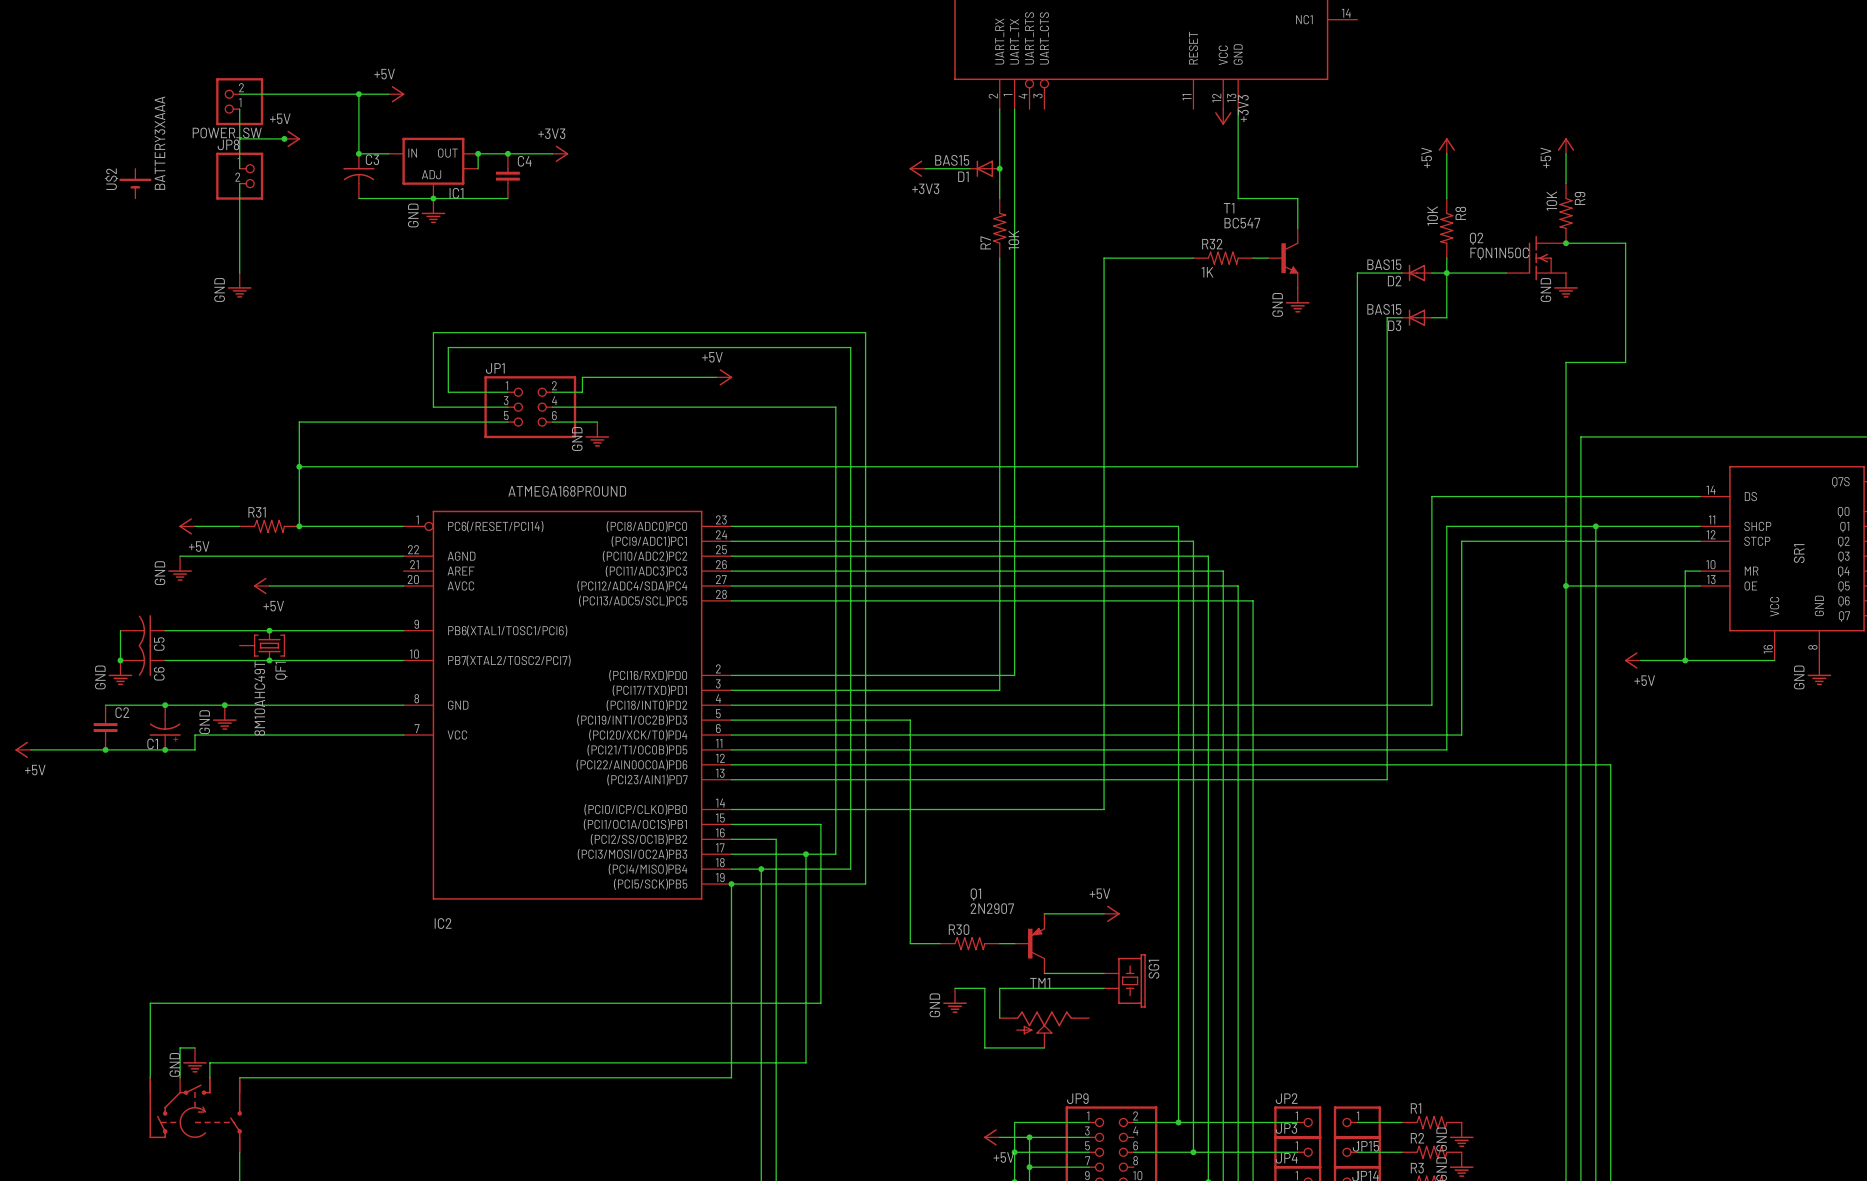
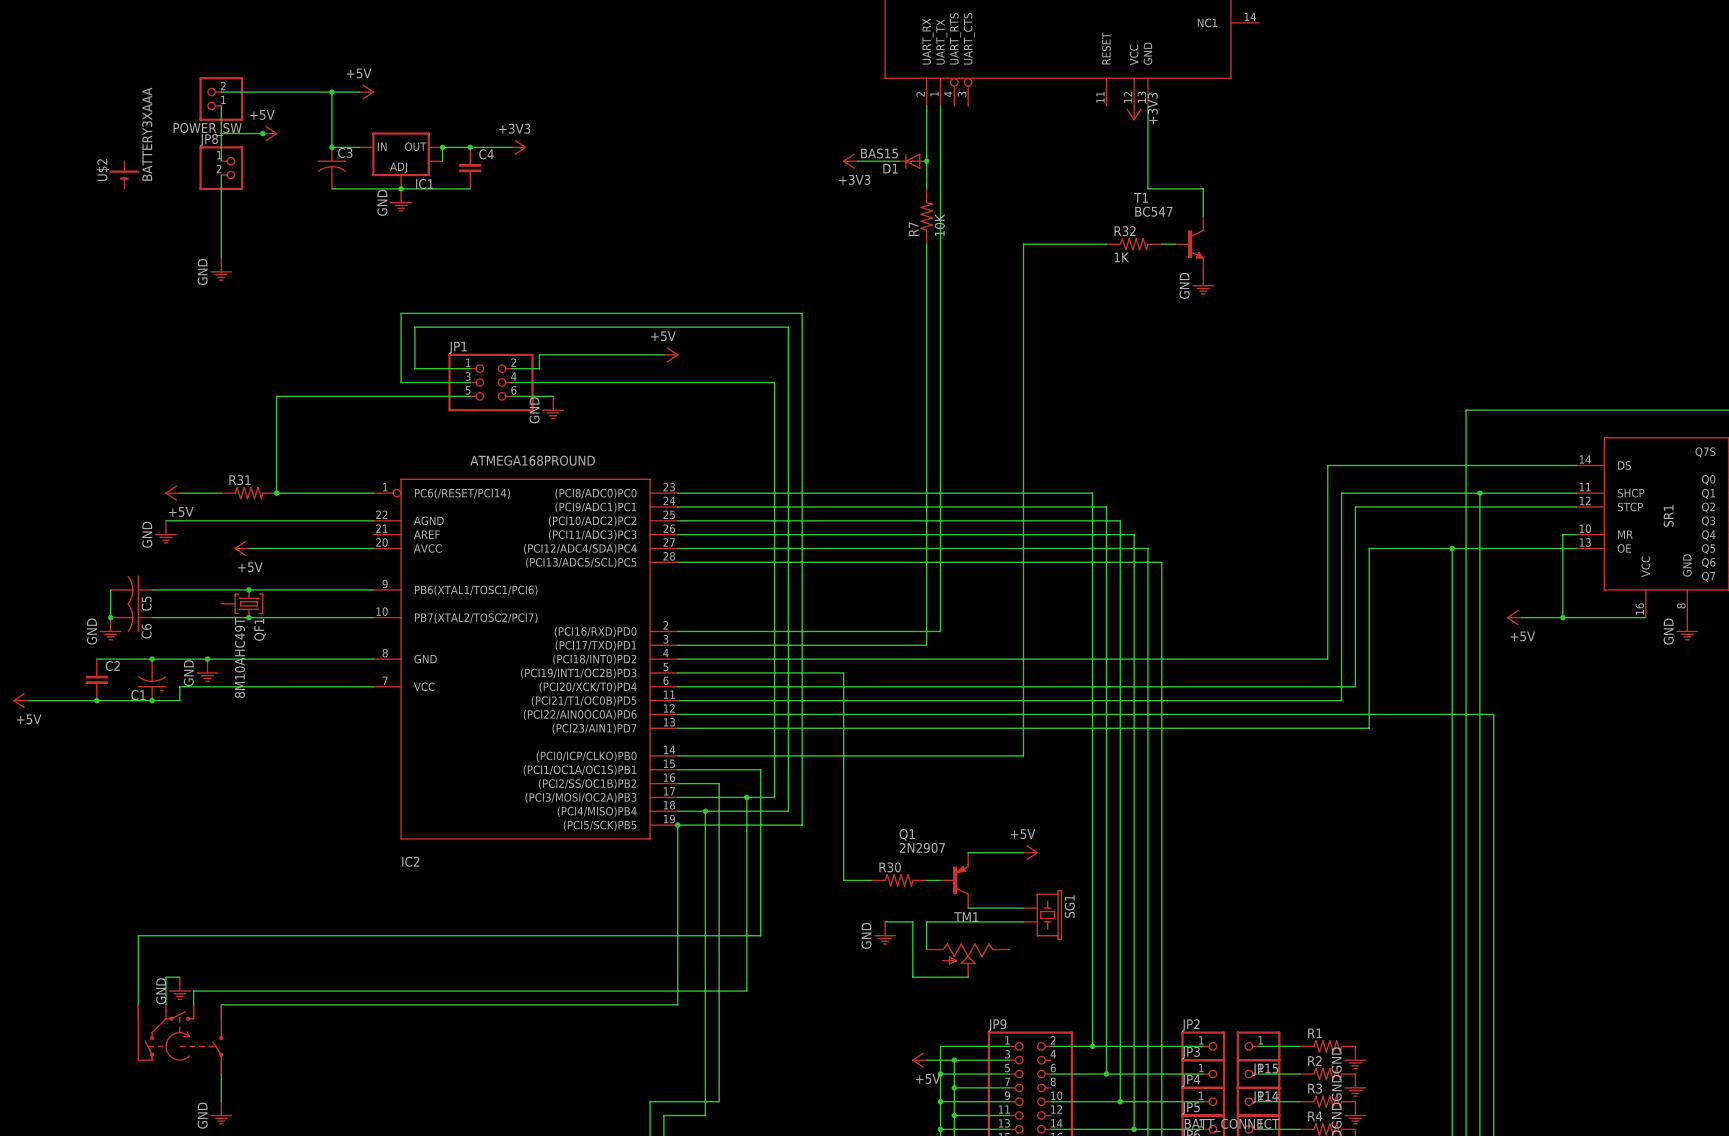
power symbol: +5V (1446, 145) -> none
power symbol: +5V (1566, 145) -> none
wire: (1446, 153) (1446, 198) -> none
wire: (1566, 153) (1566, 183) -> none
R9: 10K (1566, 213) -> none
R8: 10K (1446, 228) -> none
wire: (1566, 243) (1625, 243) (1625, 362) (1566, 362) (1566, 585) -> none
junction: (1566, 243) -> none
wire: (1446, 258) (1446, 317) (1431, 317) -> none
Q2: FQN1N50C (1536, 258) -> none
wire: (1402, 273) (1357, 273) (1357, 466) (299, 466) -> none
D2: BAS15 (1416, 273) -> none
wire: (1431, 273) (1506, 273) -> none
junction: (1446, 273) -> none
power symbol: GND (1566, 285) -> none
wire: (1402, 317) (1387, 317) (1387, 779) -> (1452, 548) (1369, 548) (1369, 728) (1286, 728)
D3: BAS15 (1416, 317) -> none
junction: (299, 466) -> none

